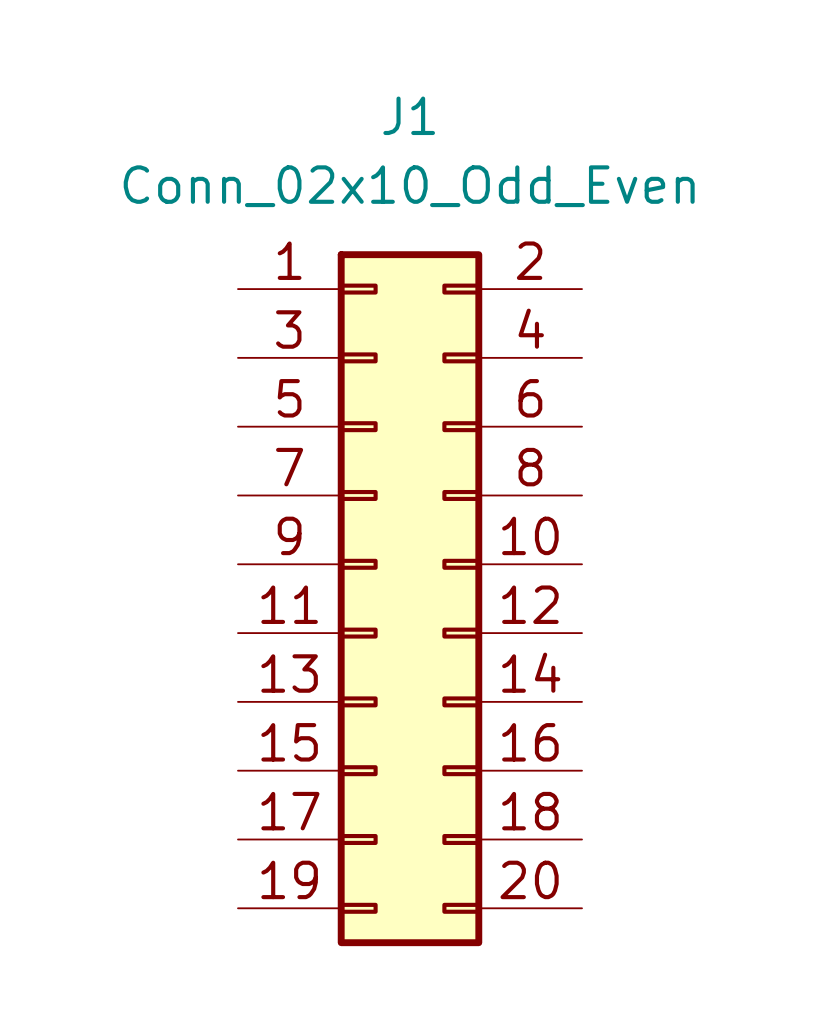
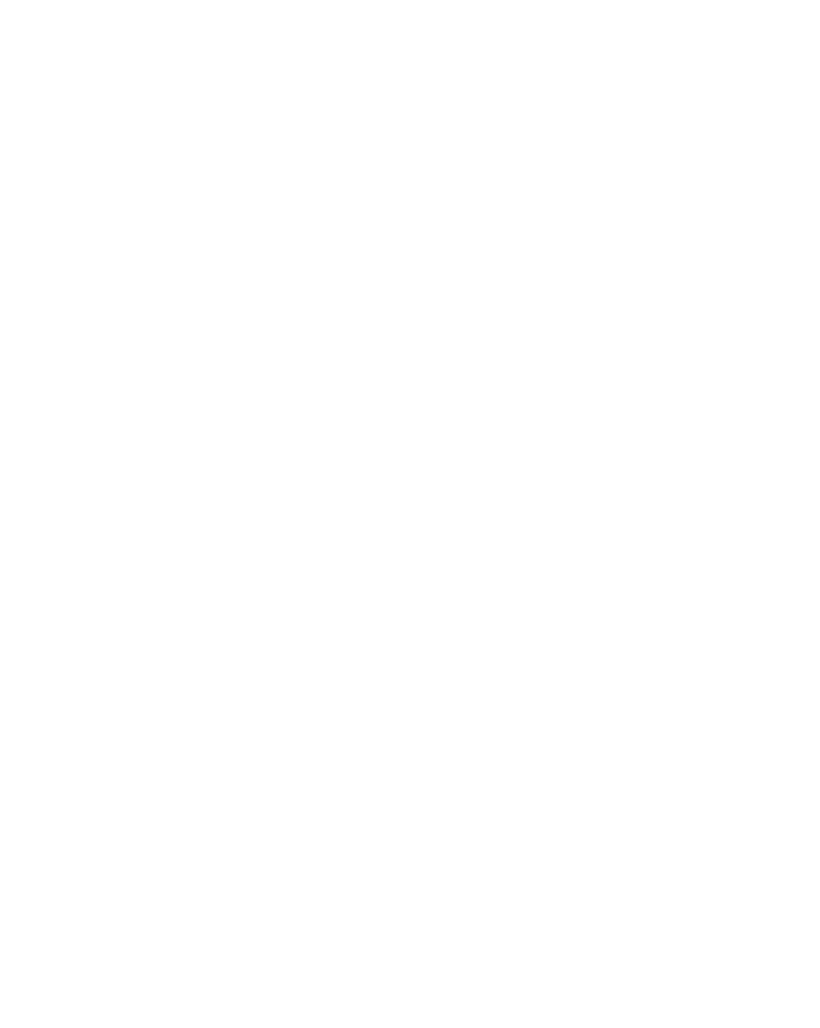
J1: Conn_02x10_Odd_Even (409, 598) -> none

